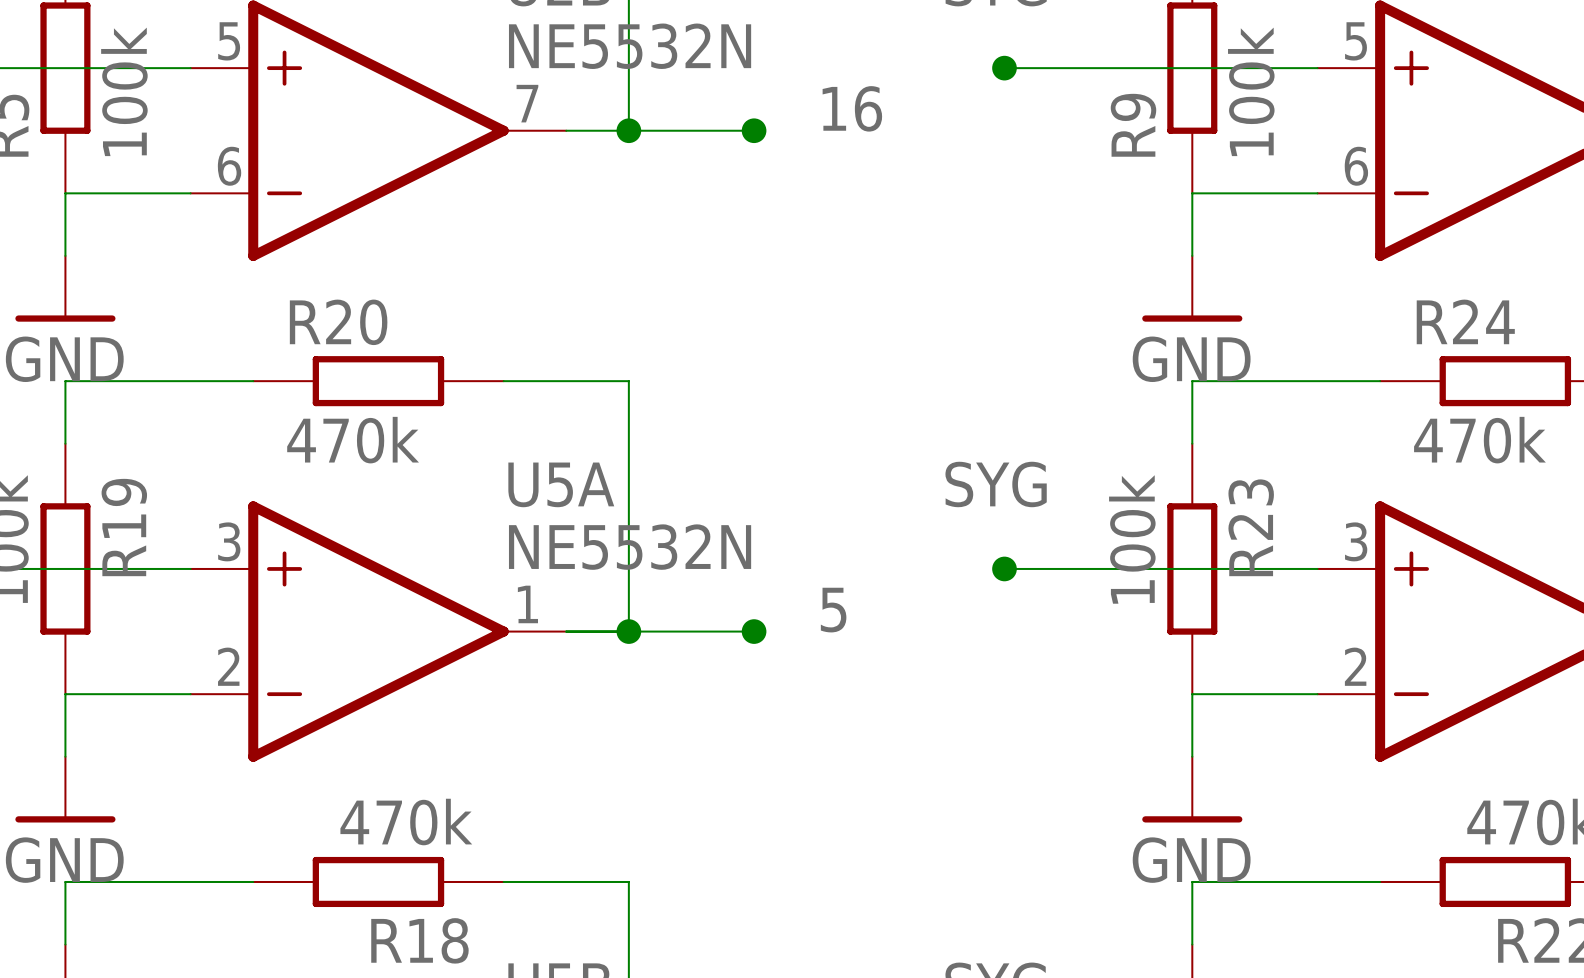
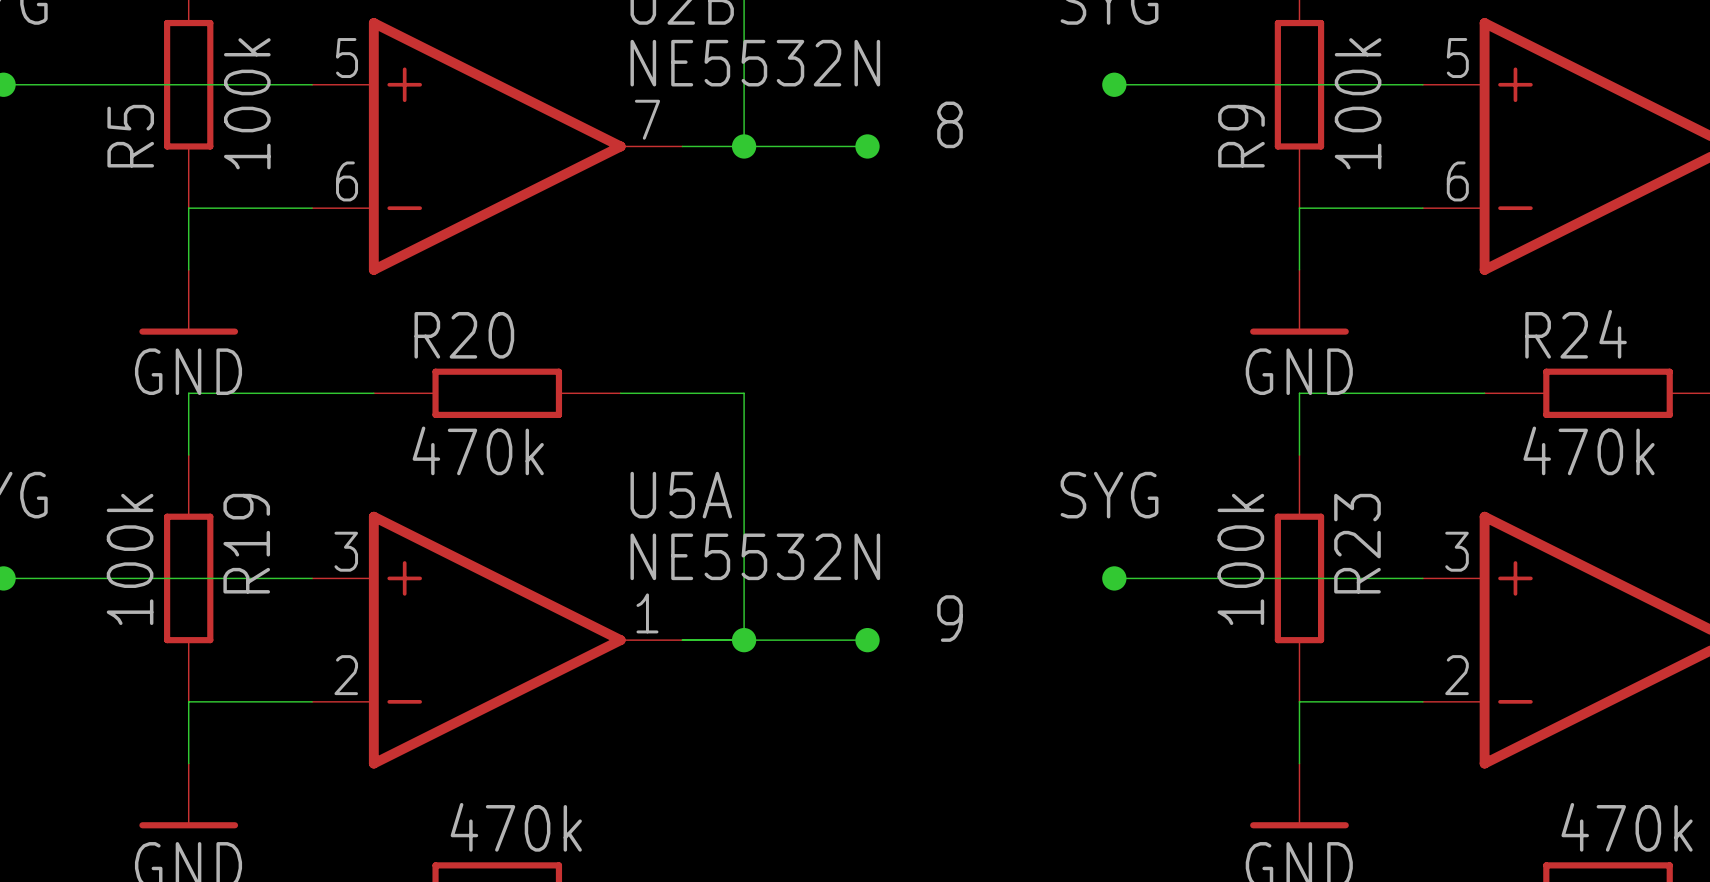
label: 16 (852, 108) -> 8 (950, 124)
label: 5 (833, 610) -> 9 (950, 618)

